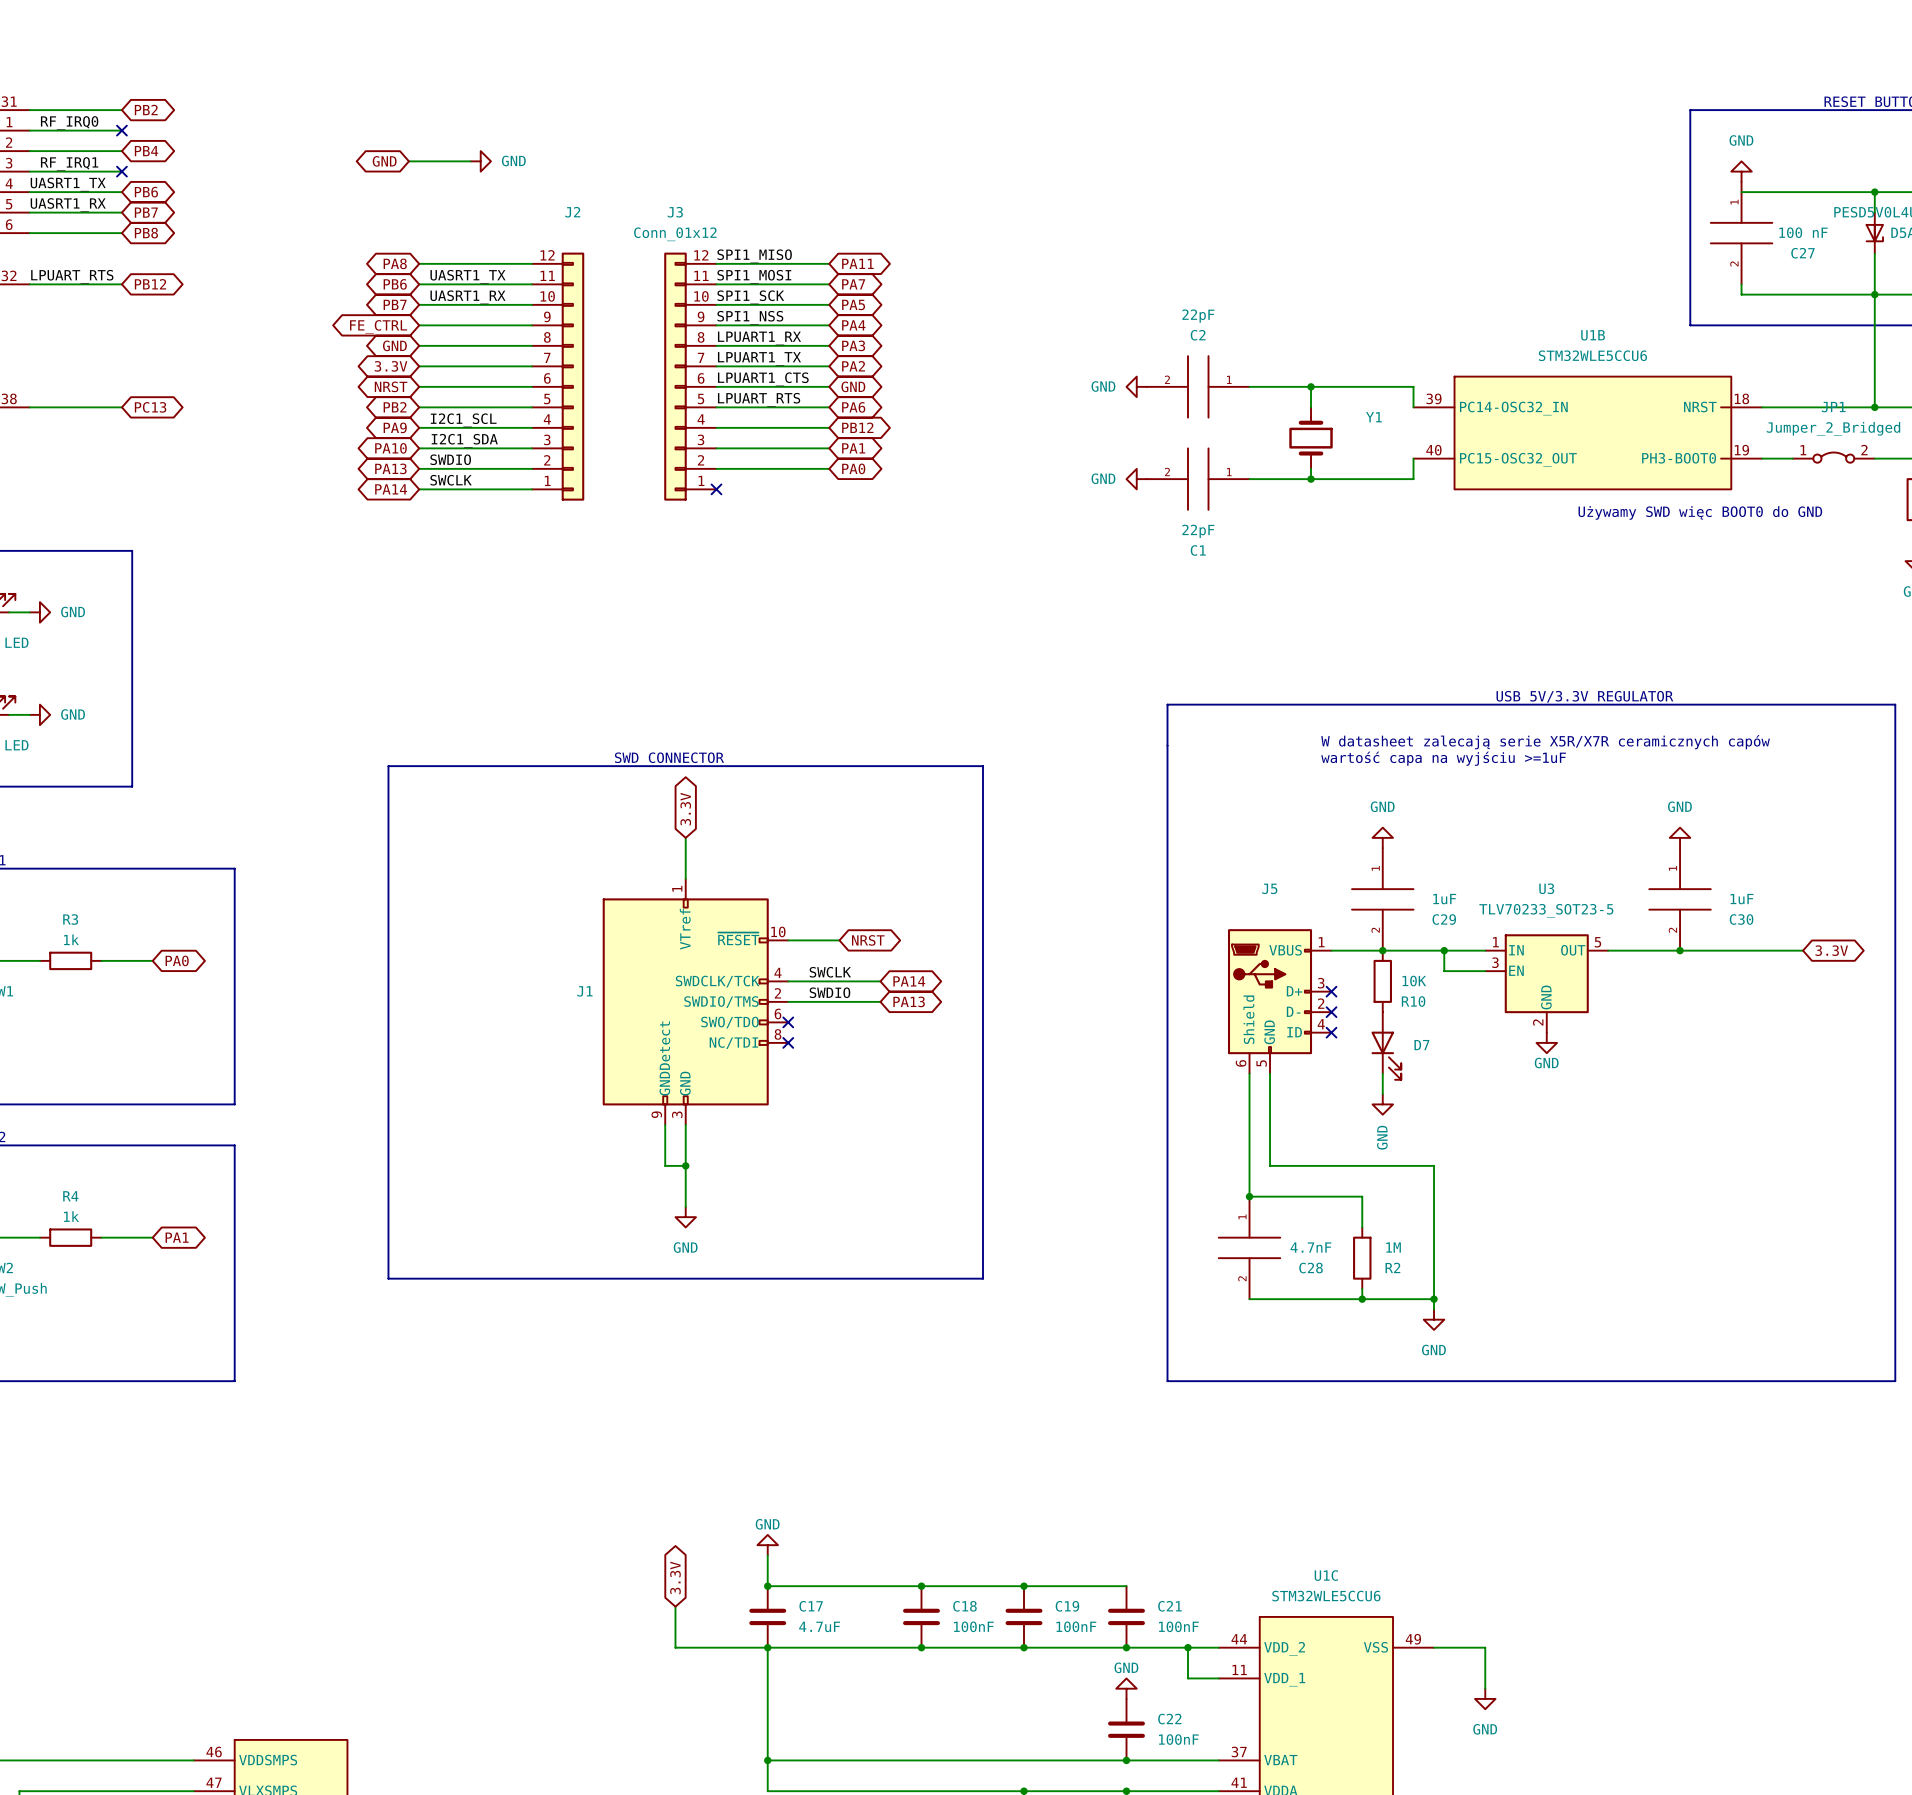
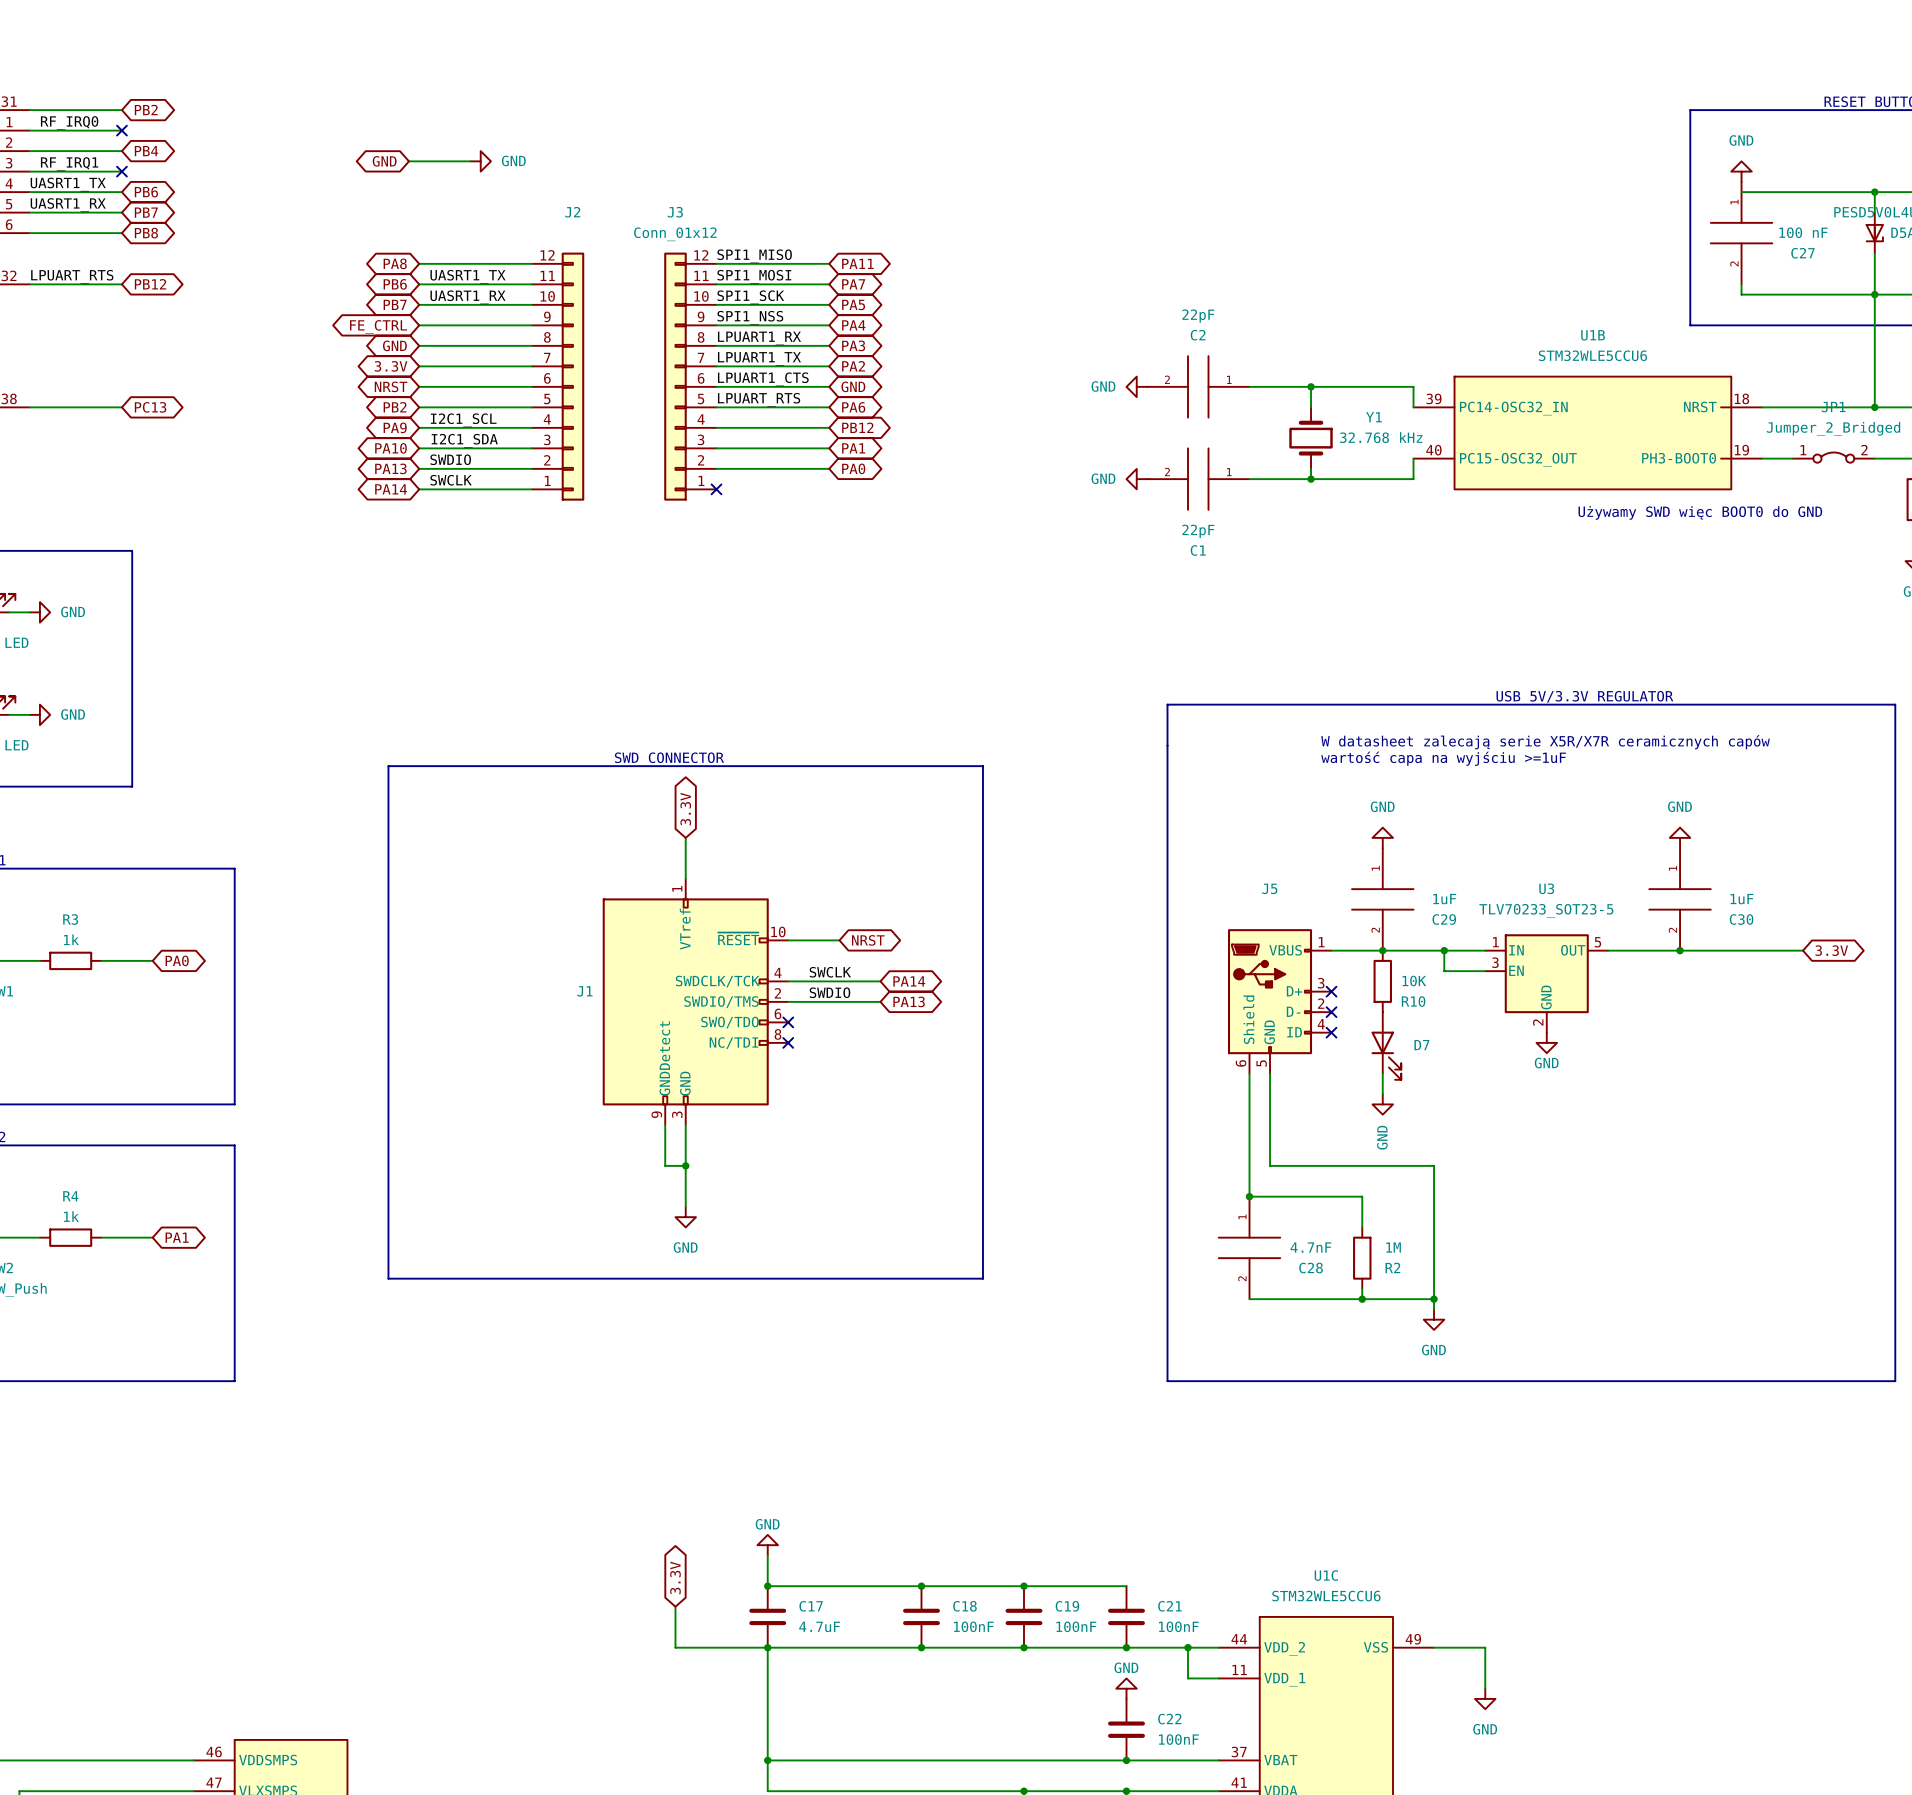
Y1 value: none -> 32.768 kHz (1381, 437)

